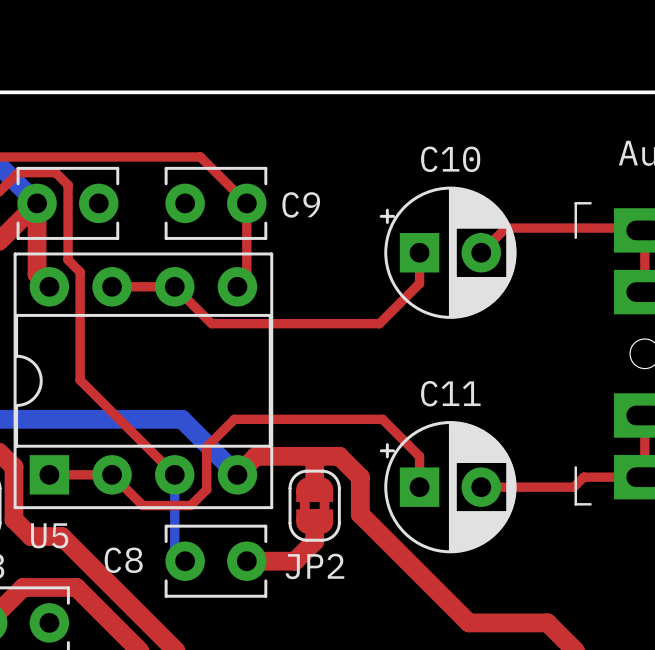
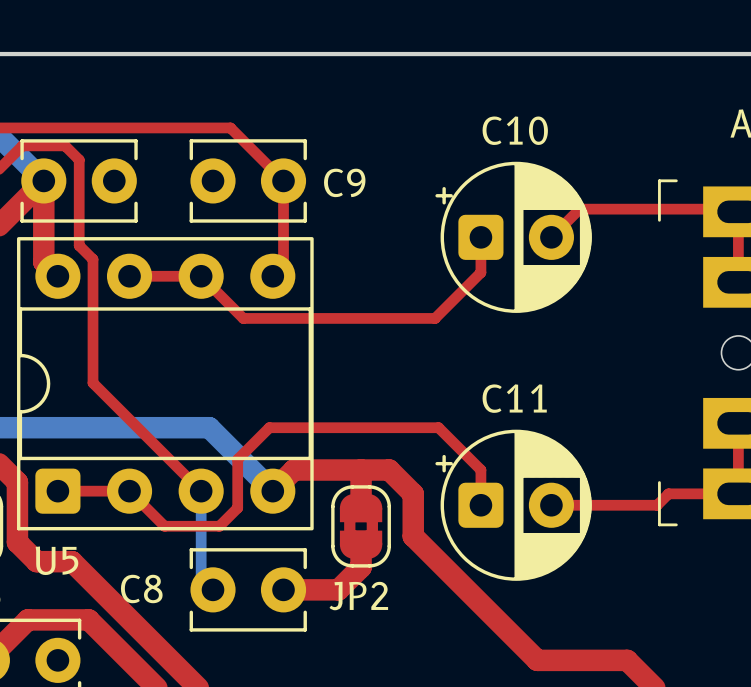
C10 footprint: [379, 186, 517, 319] -> [435, 161, 592, 313]
U5 footprint: [13, 252, 274, 510] -> [17, 237, 314, 531]
C11 footprint: [379, 421, 517, 554] -> [435, 429, 592, 581]

